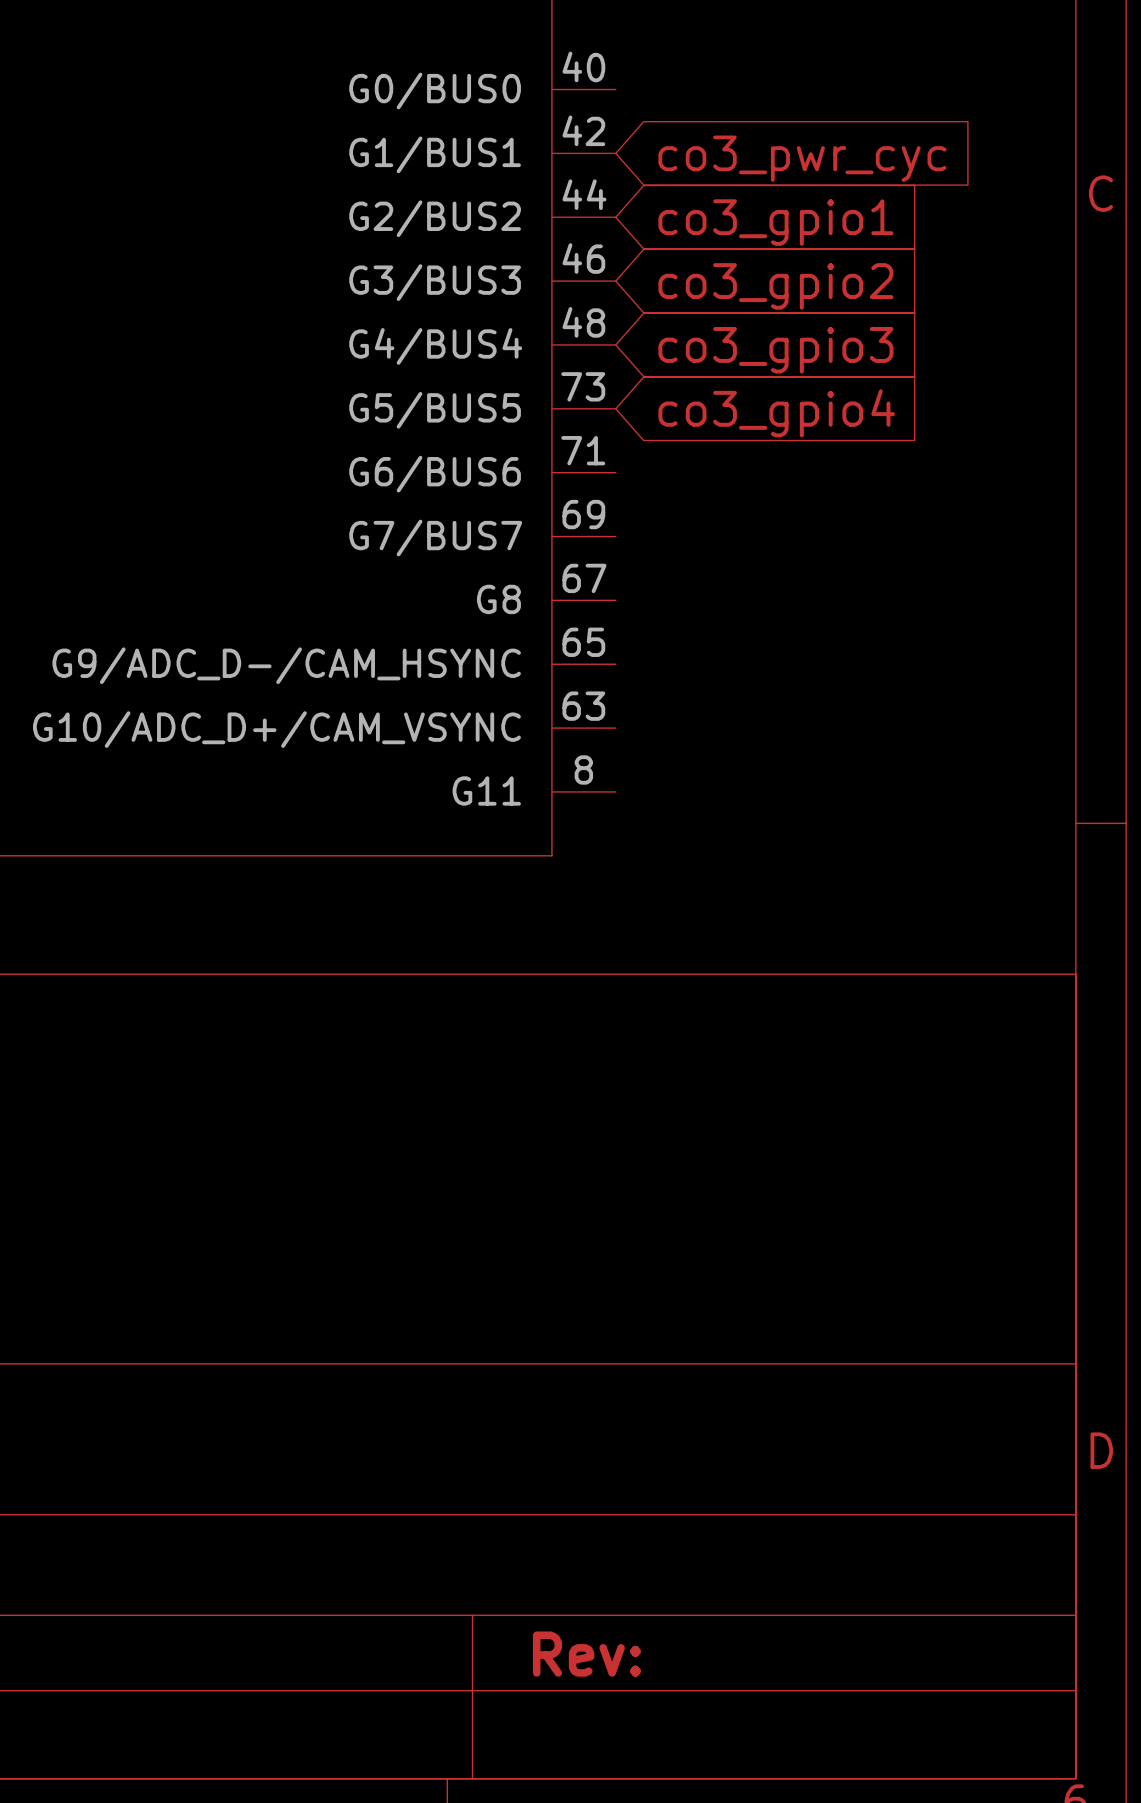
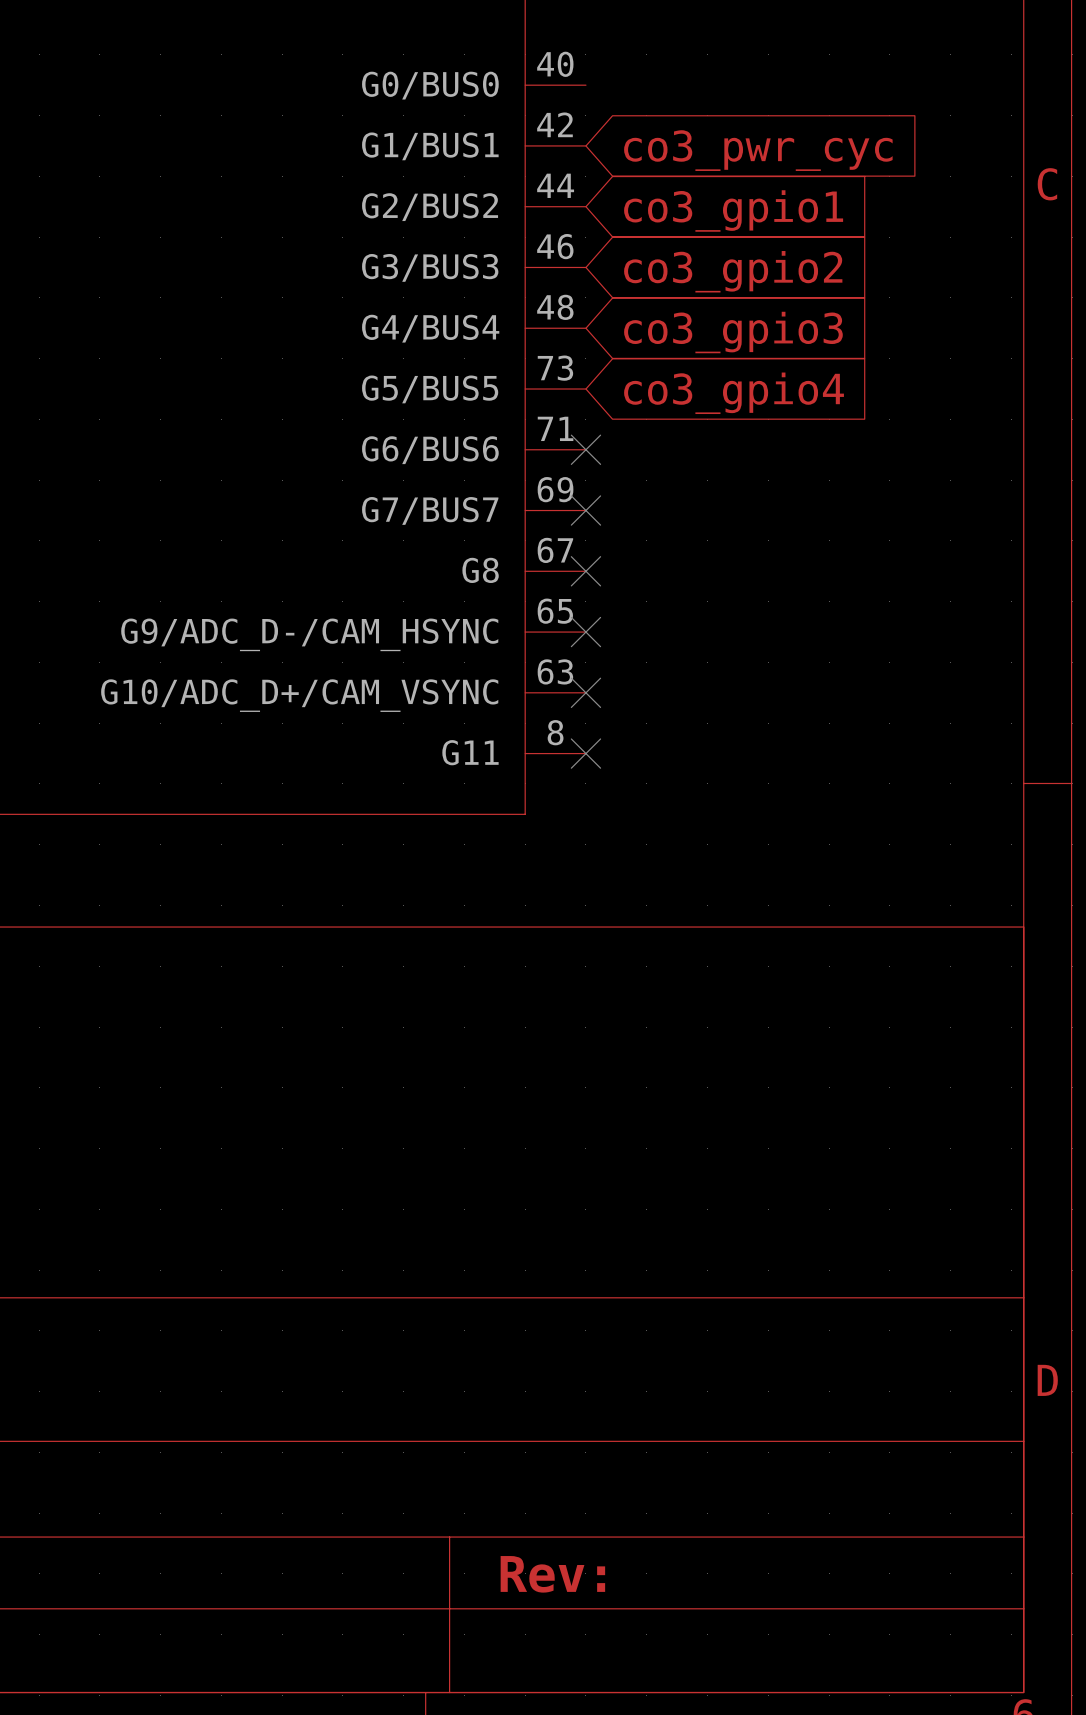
no-connect mark: none -> (585, 449)
no-connect mark: none -> (585, 510)
no-connect mark: none -> (585, 571)
no-connect mark: none -> (585, 632)
no-connect mark: none -> (585, 692)
no-connect mark: none -> (585, 753)

